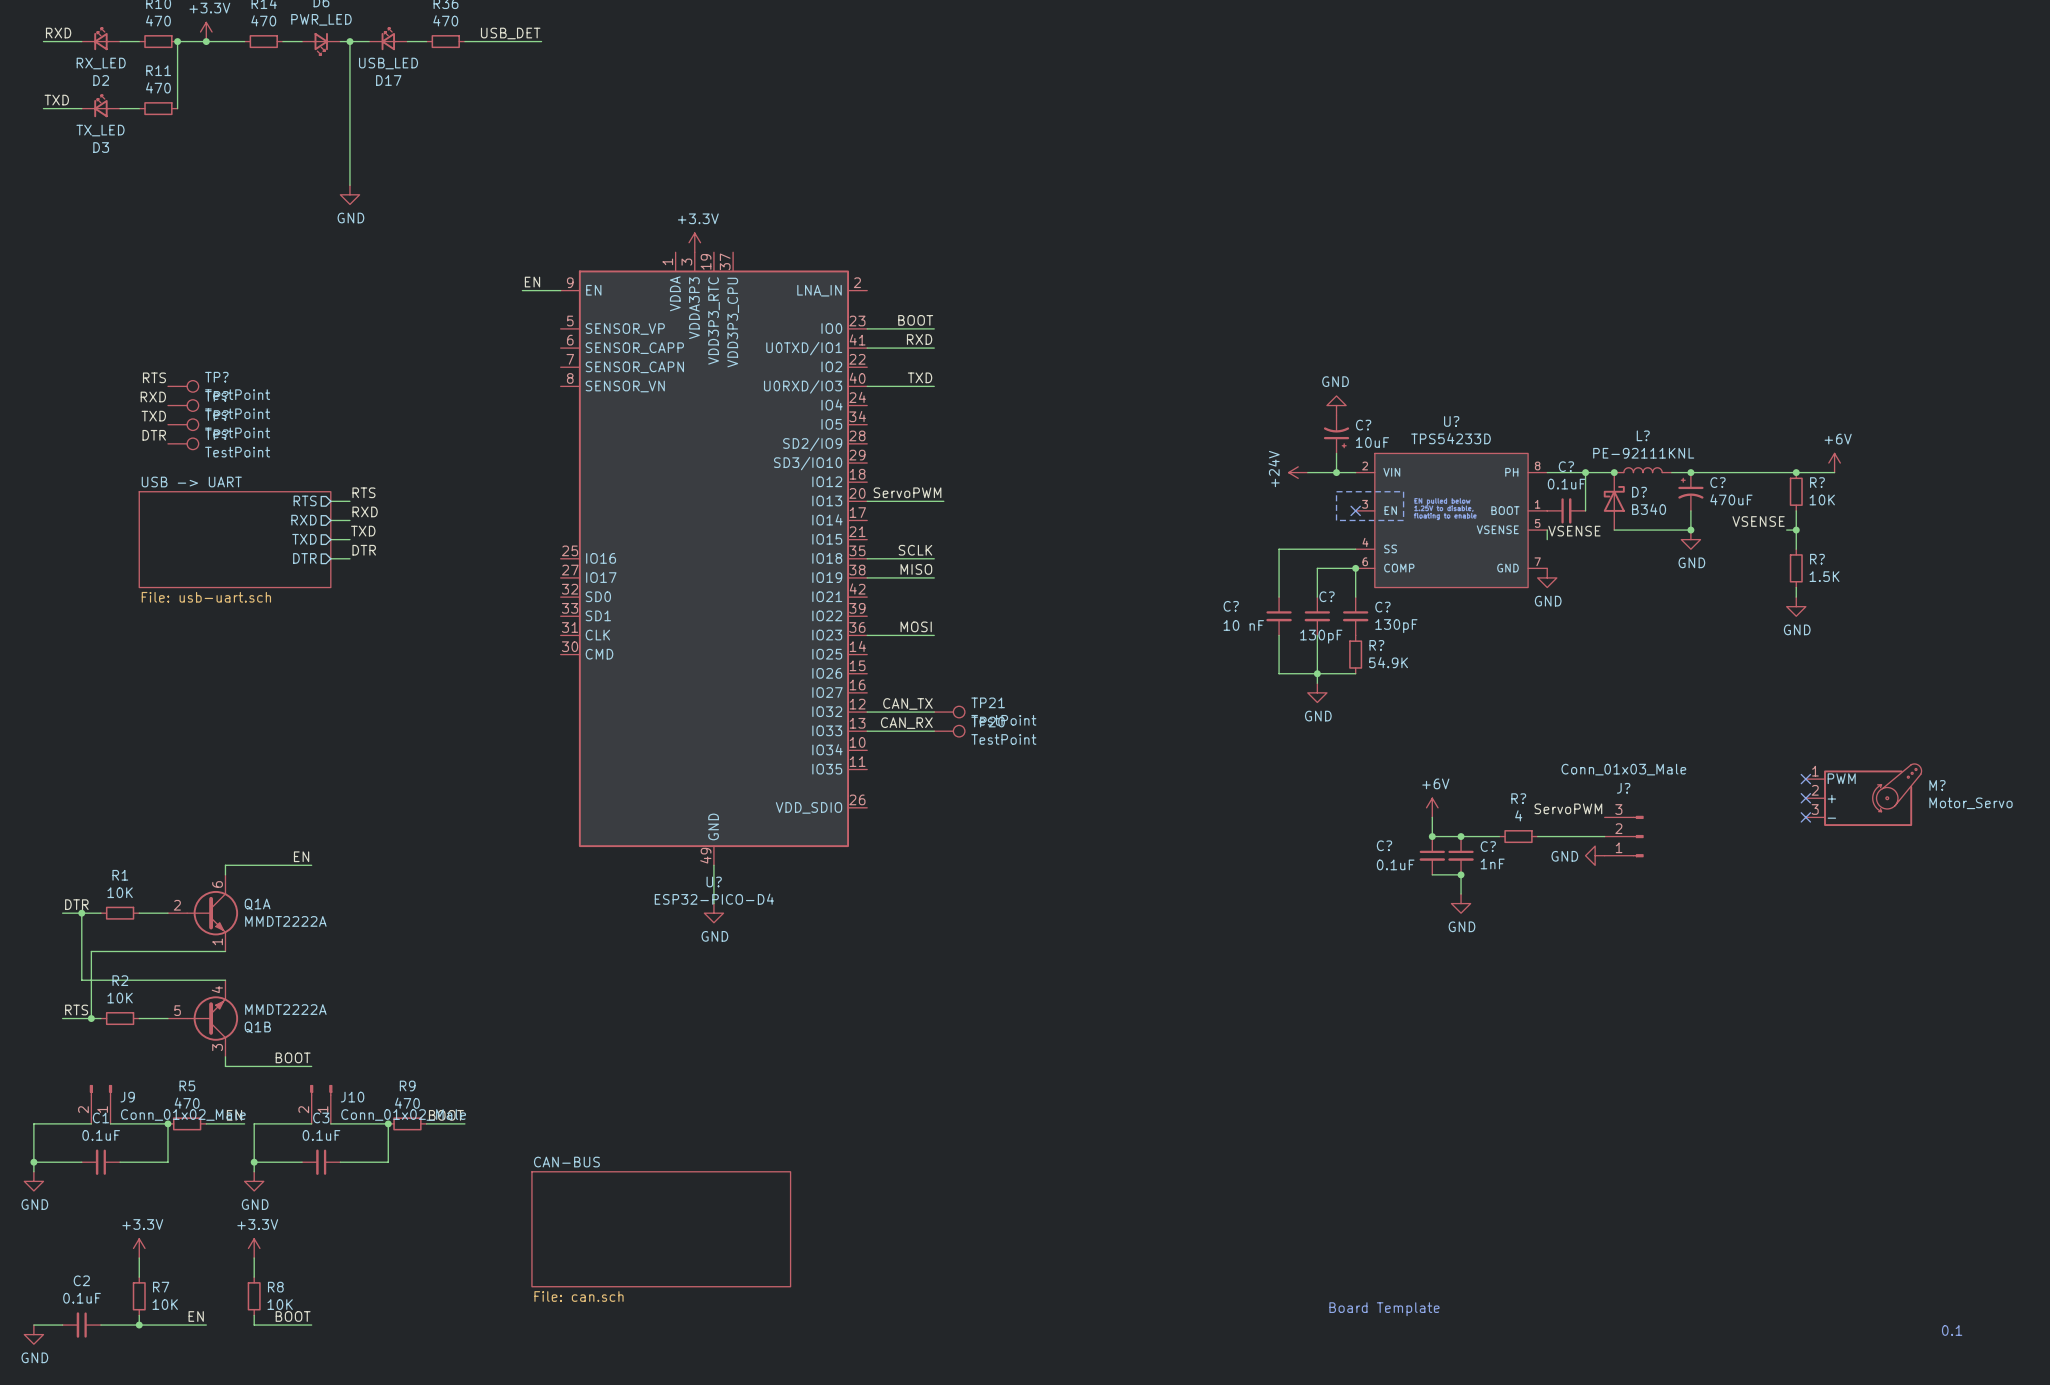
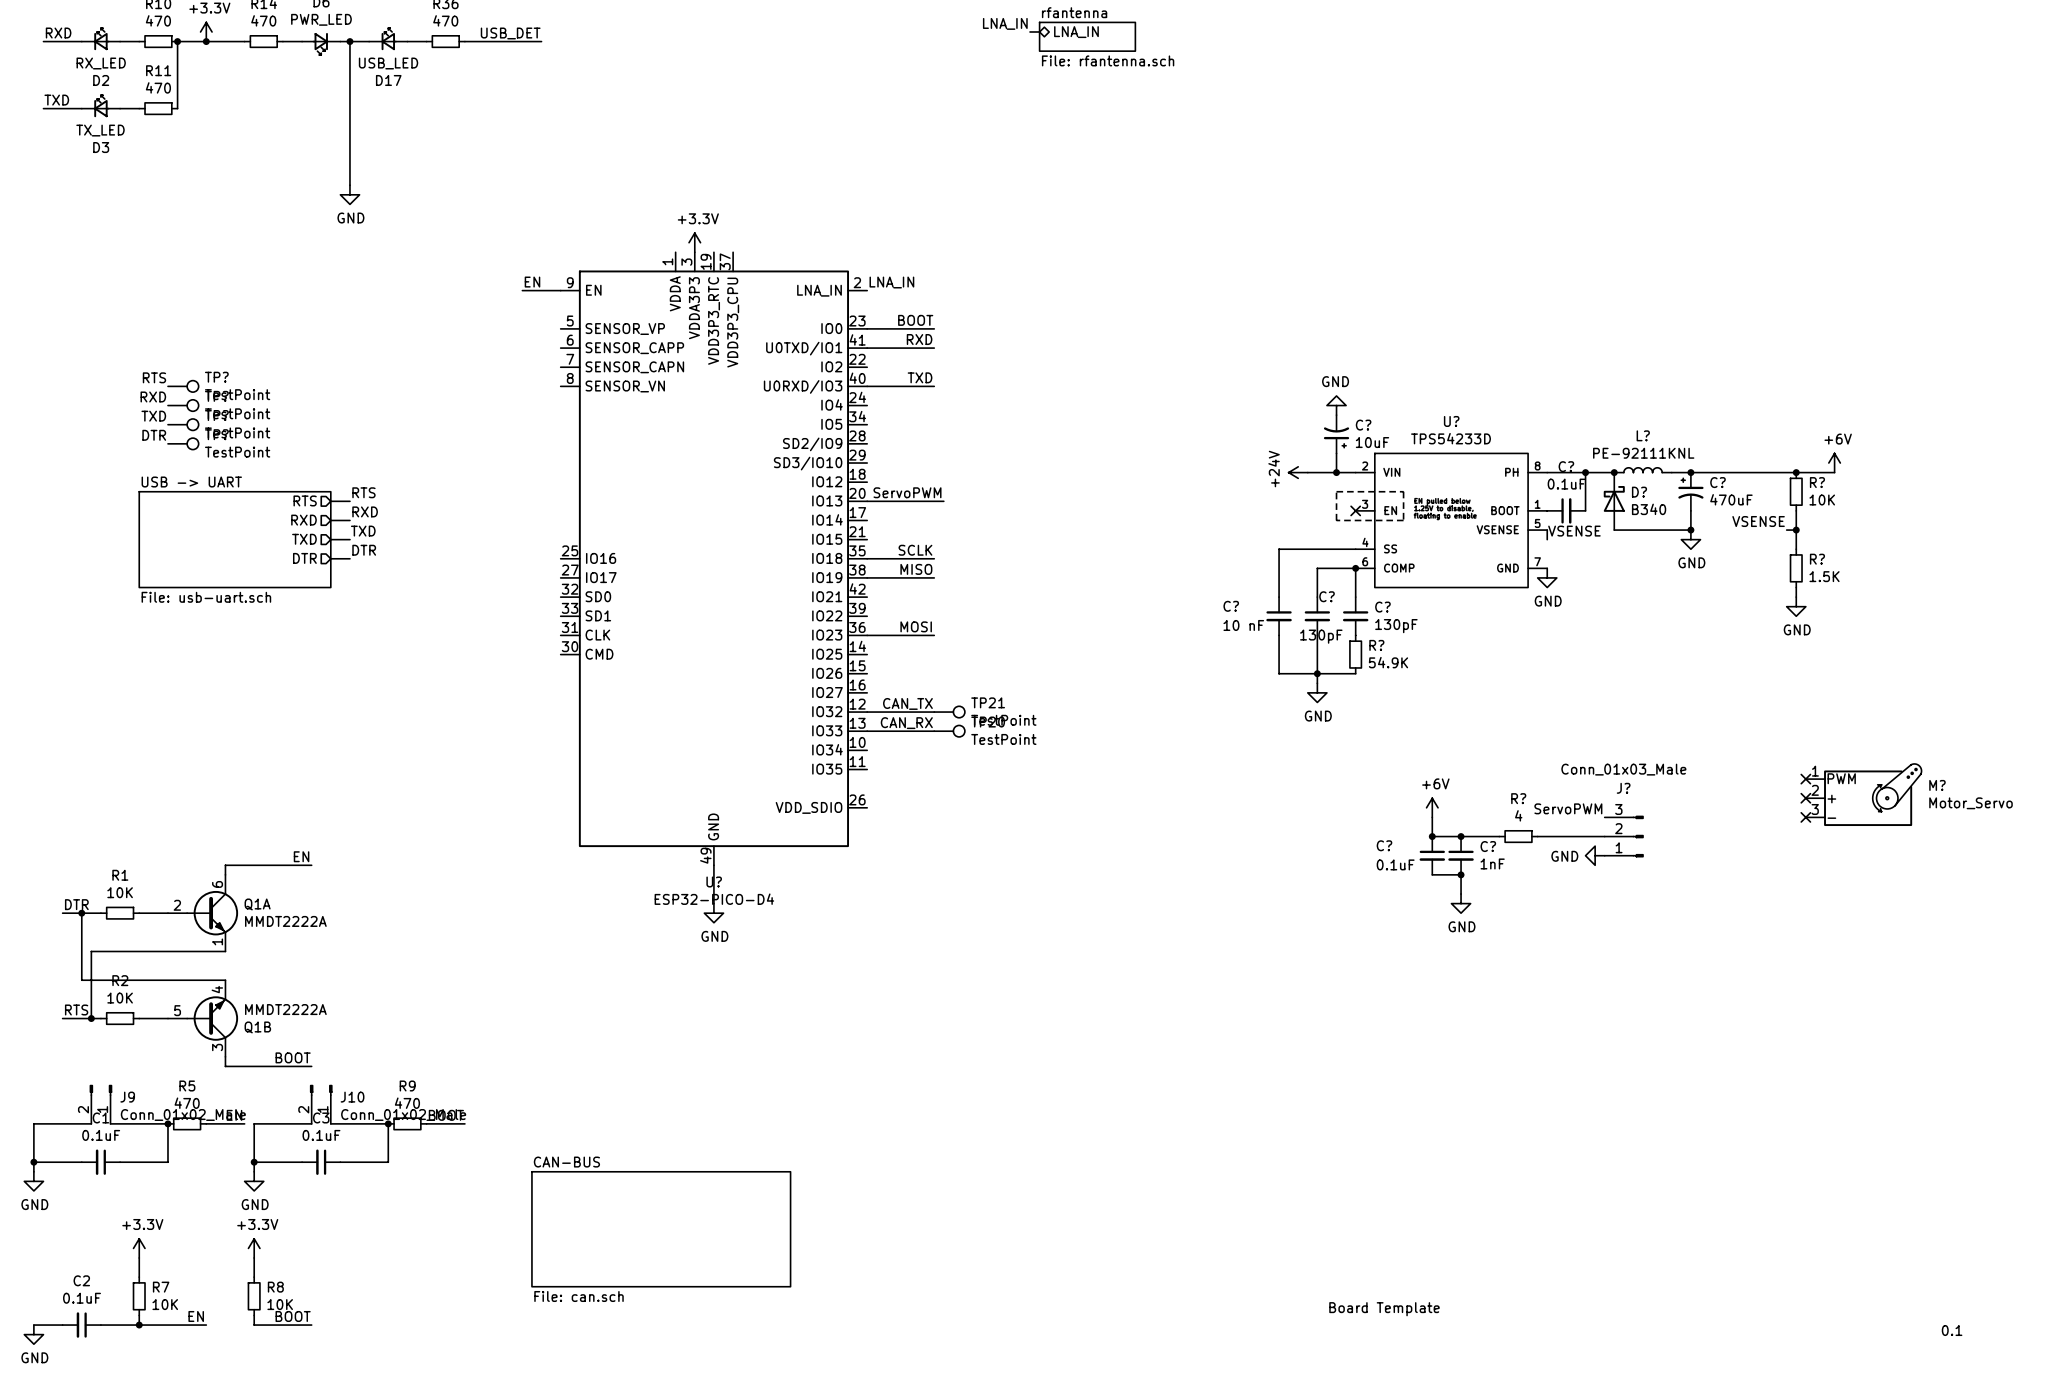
label: none -> LNA_IN (1005, 23)
wire: none -> (1030, 31) (1039, 31)
sheet pin: none -> LNA_IN (1076, 32)
sheet rfantenna: none -> File: rfantenna.sch (1087, 36)
label: none -> LNA_IN (891, 282)

